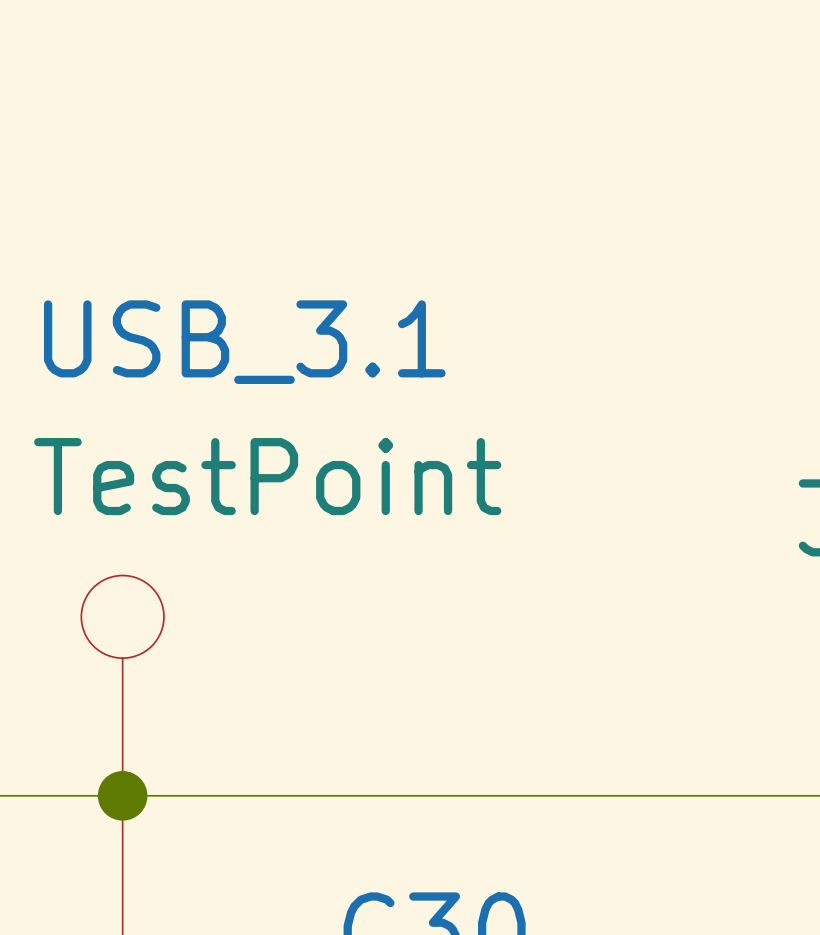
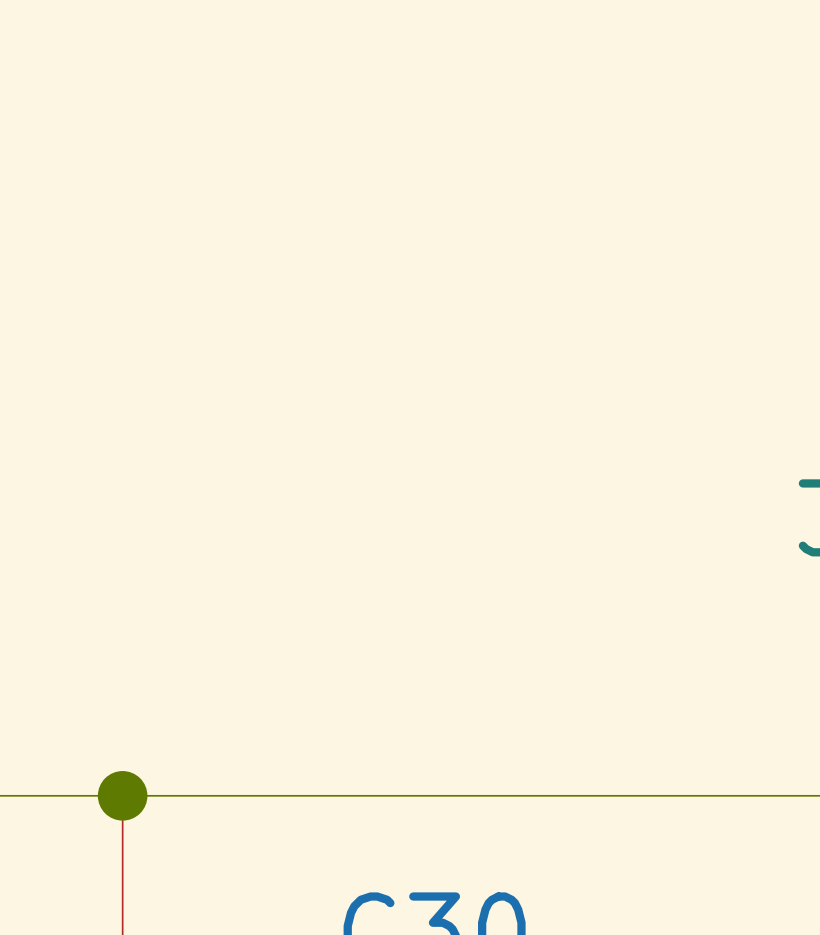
USB_3.1: TestPoint (122, 685) -> none

